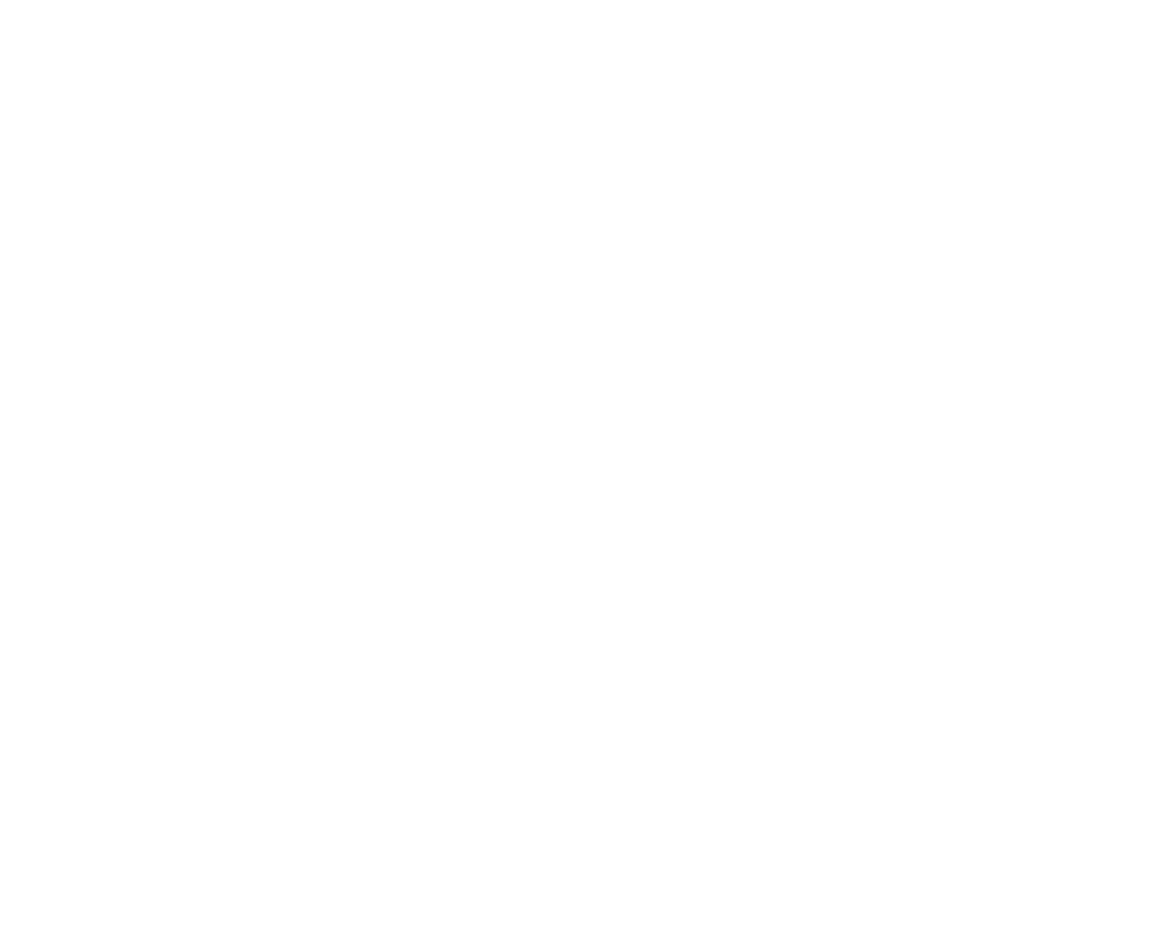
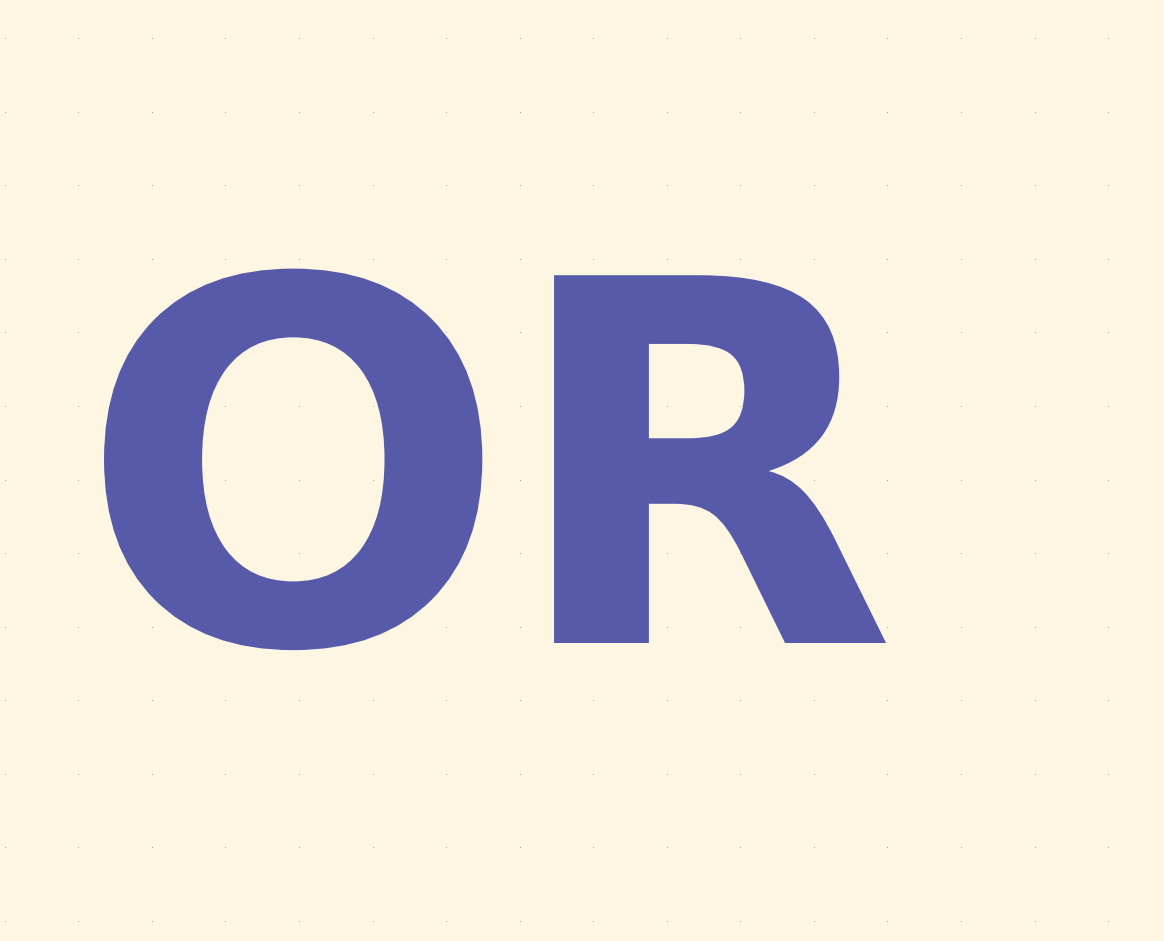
text: none -> OR (495, 459)

